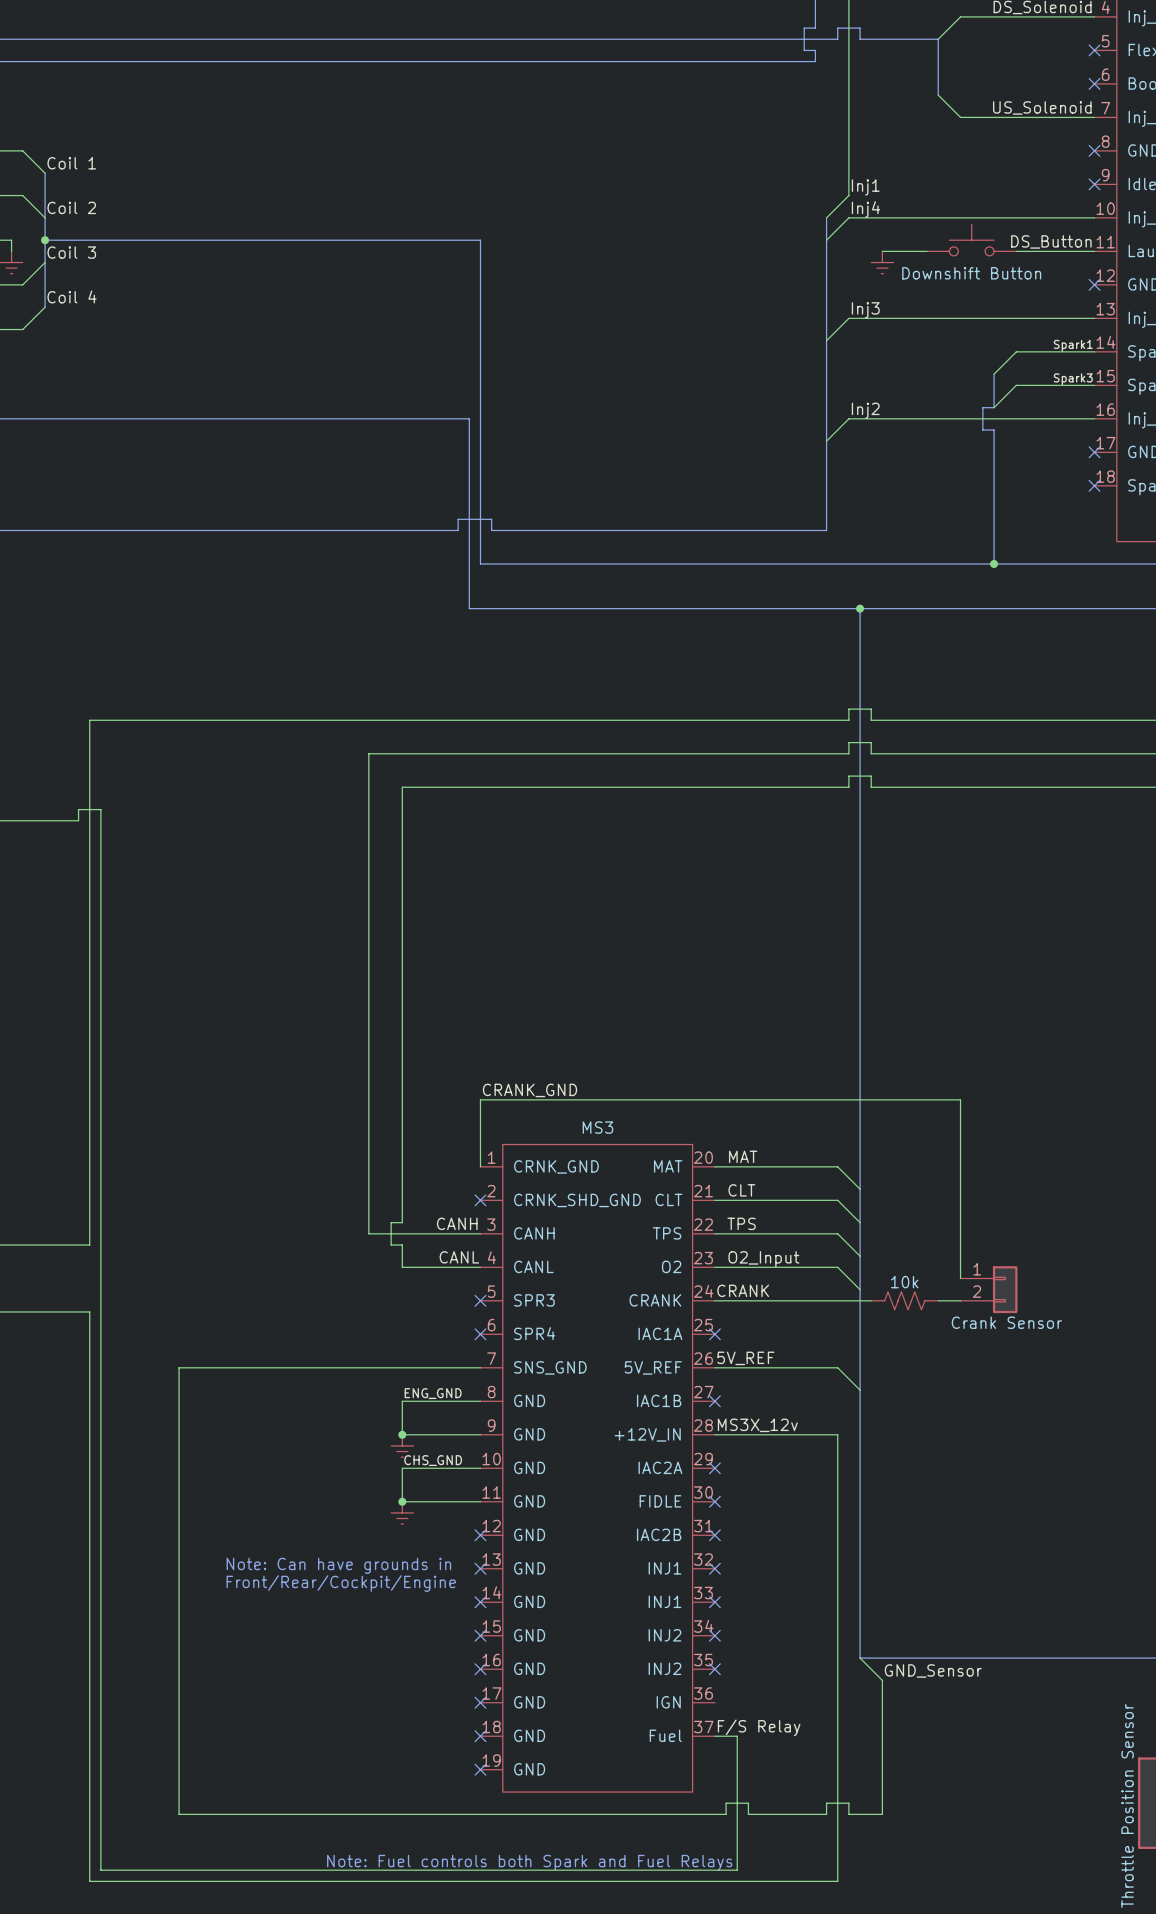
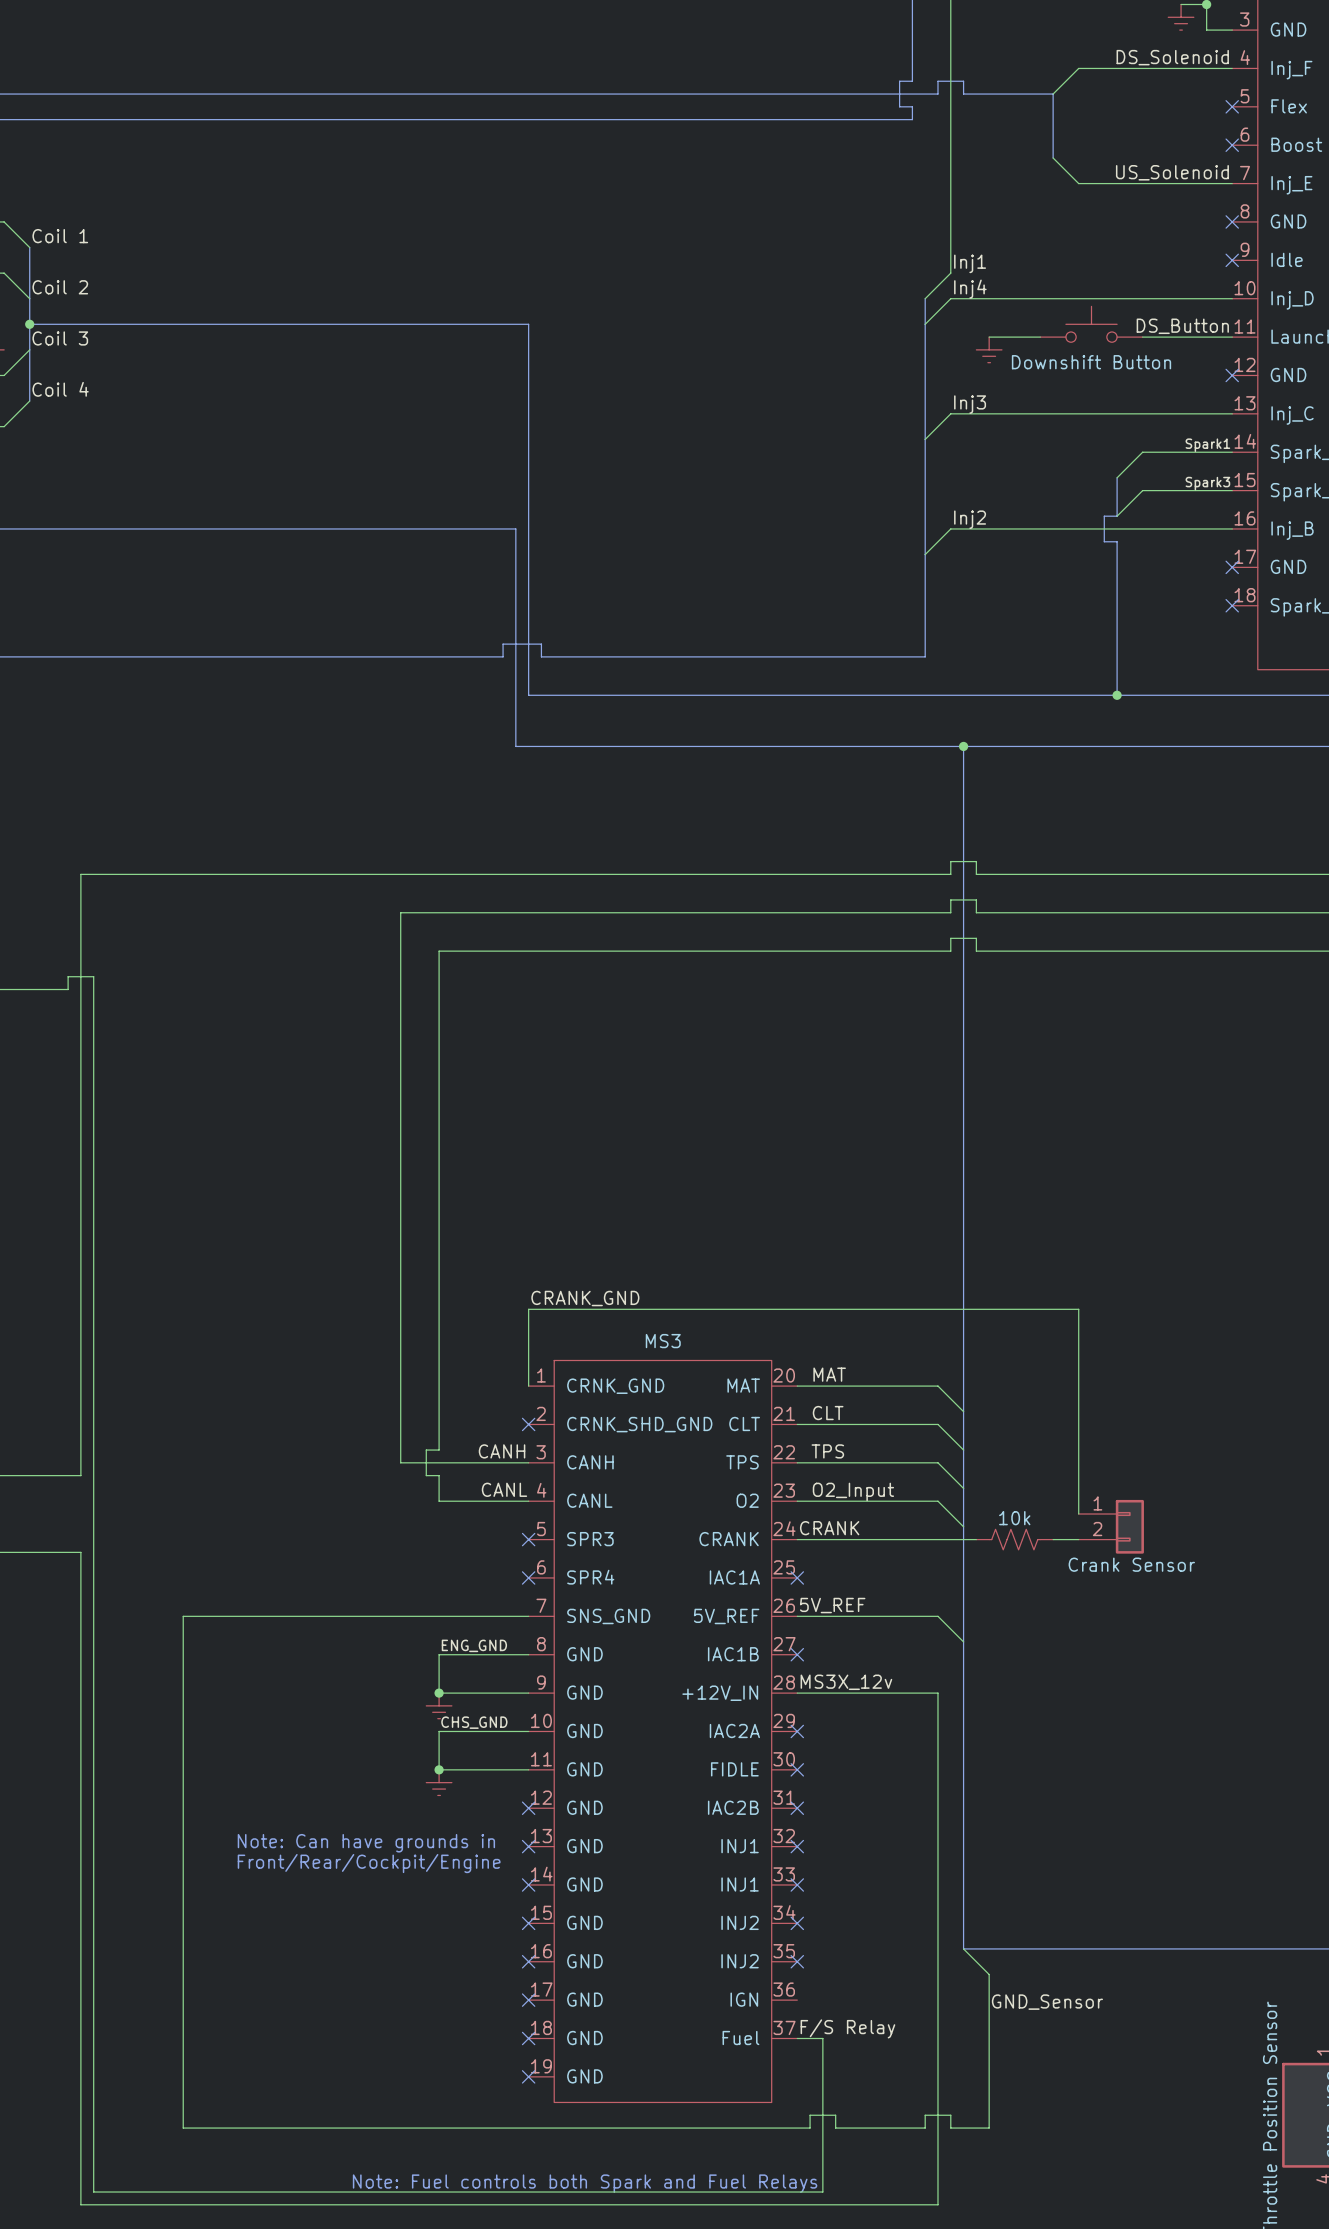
label position: GND_Sensor (933, 1670) -> GND_Sensor (1047, 2002)

